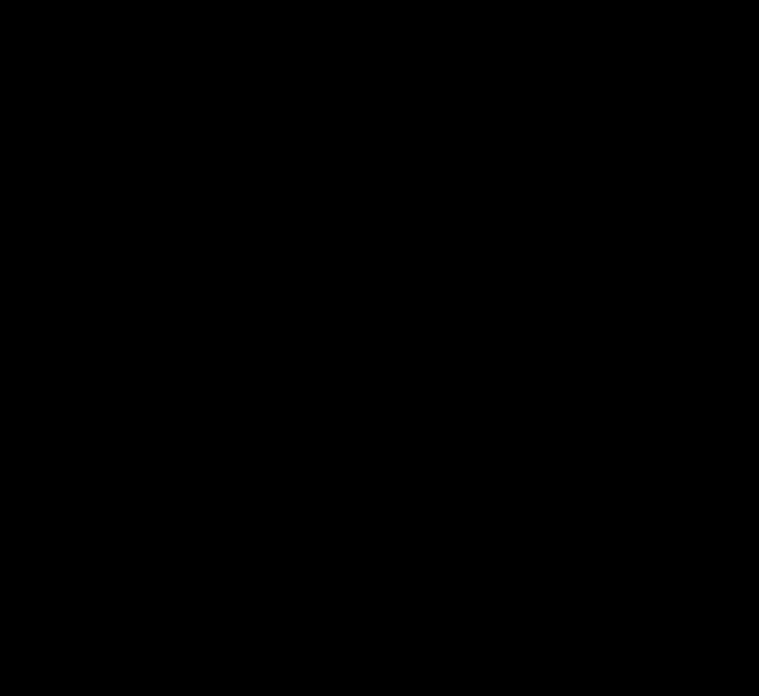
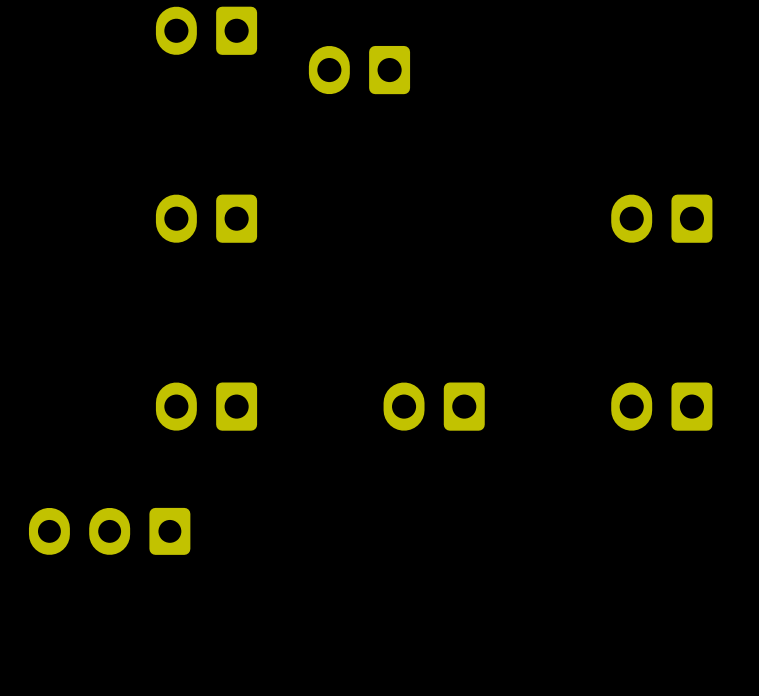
part: none -> (206, 30)
part: none -> (359, 70)
part: none -> (206, 218)
part: none -> (661, 218)
part: none -> (206, 406)
part: none -> (434, 406)
part: none -> (661, 406)
part: none -> (109, 531)

